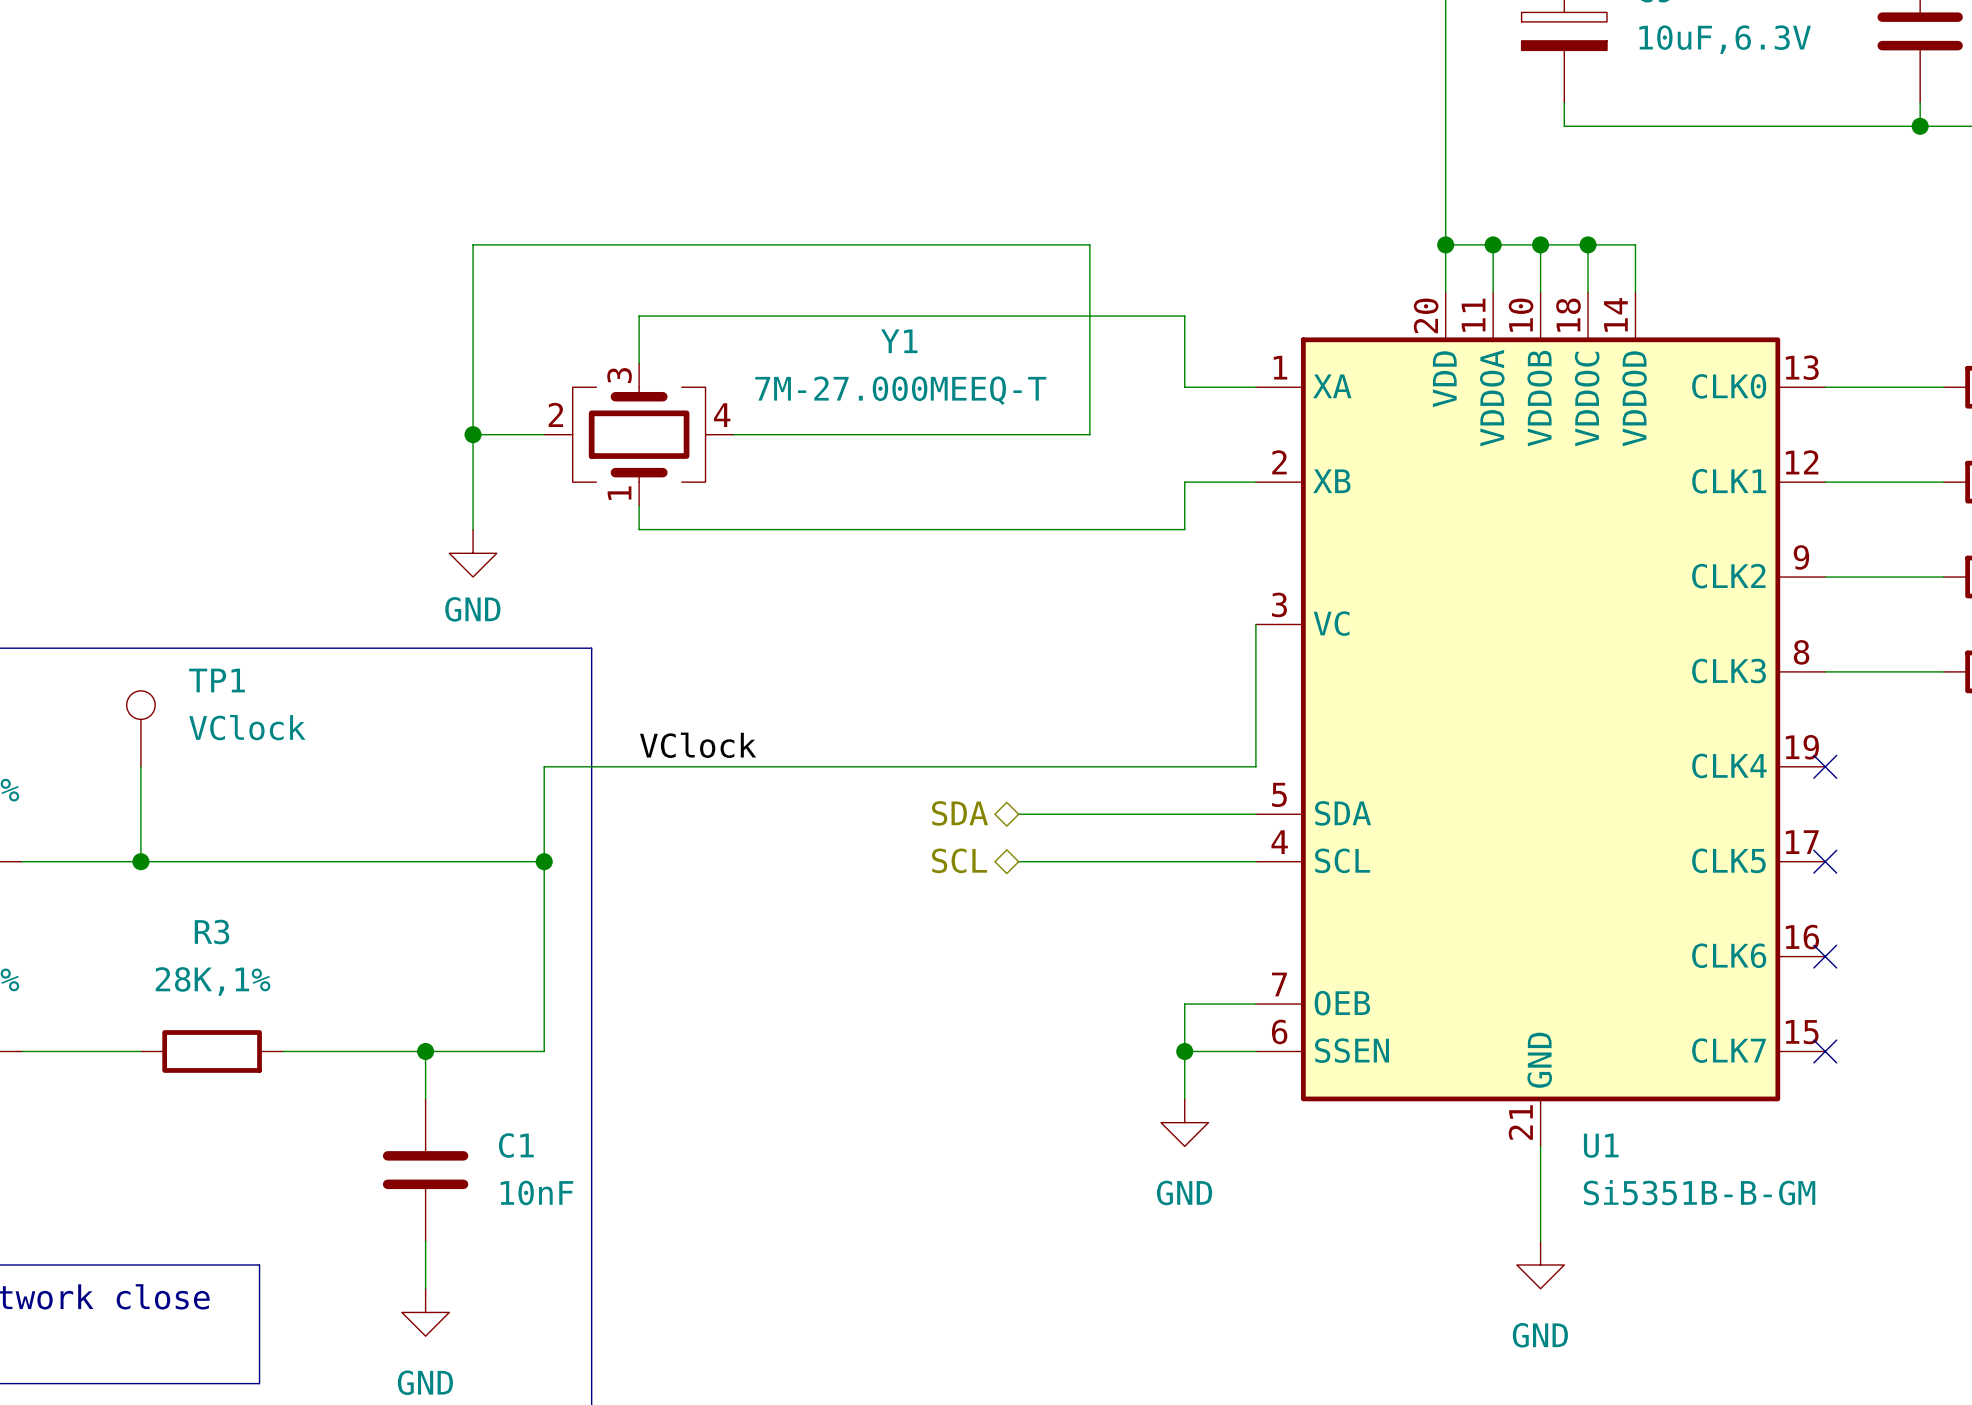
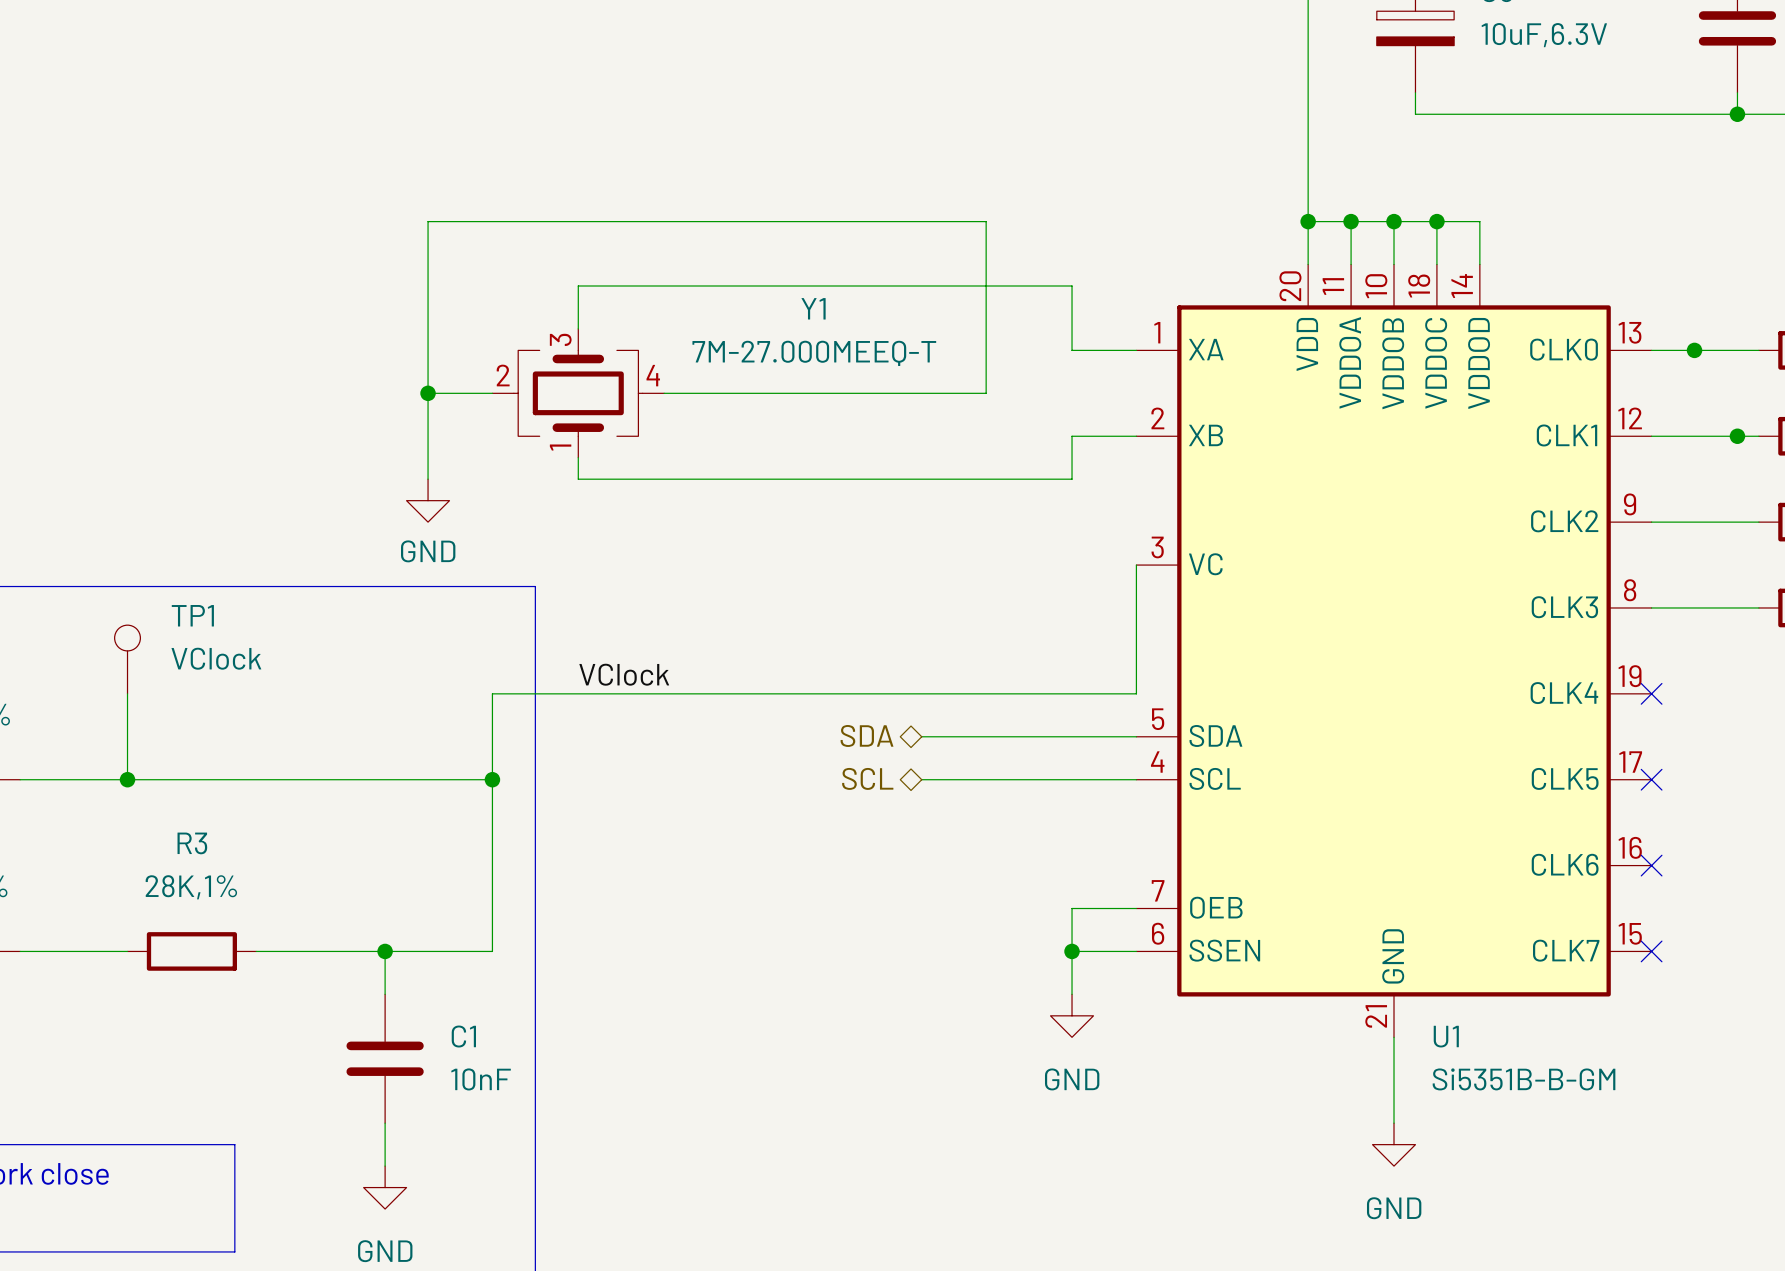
junction: none -> (1694, 350)
junction: none -> (1737, 436)

